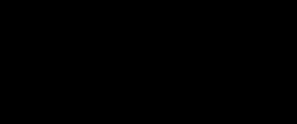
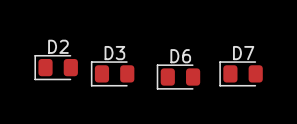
D2: none -> (56, 67)
D3: none -> (112, 73)
D7: none -> (241, 73)
D6: none -> (178, 77)

